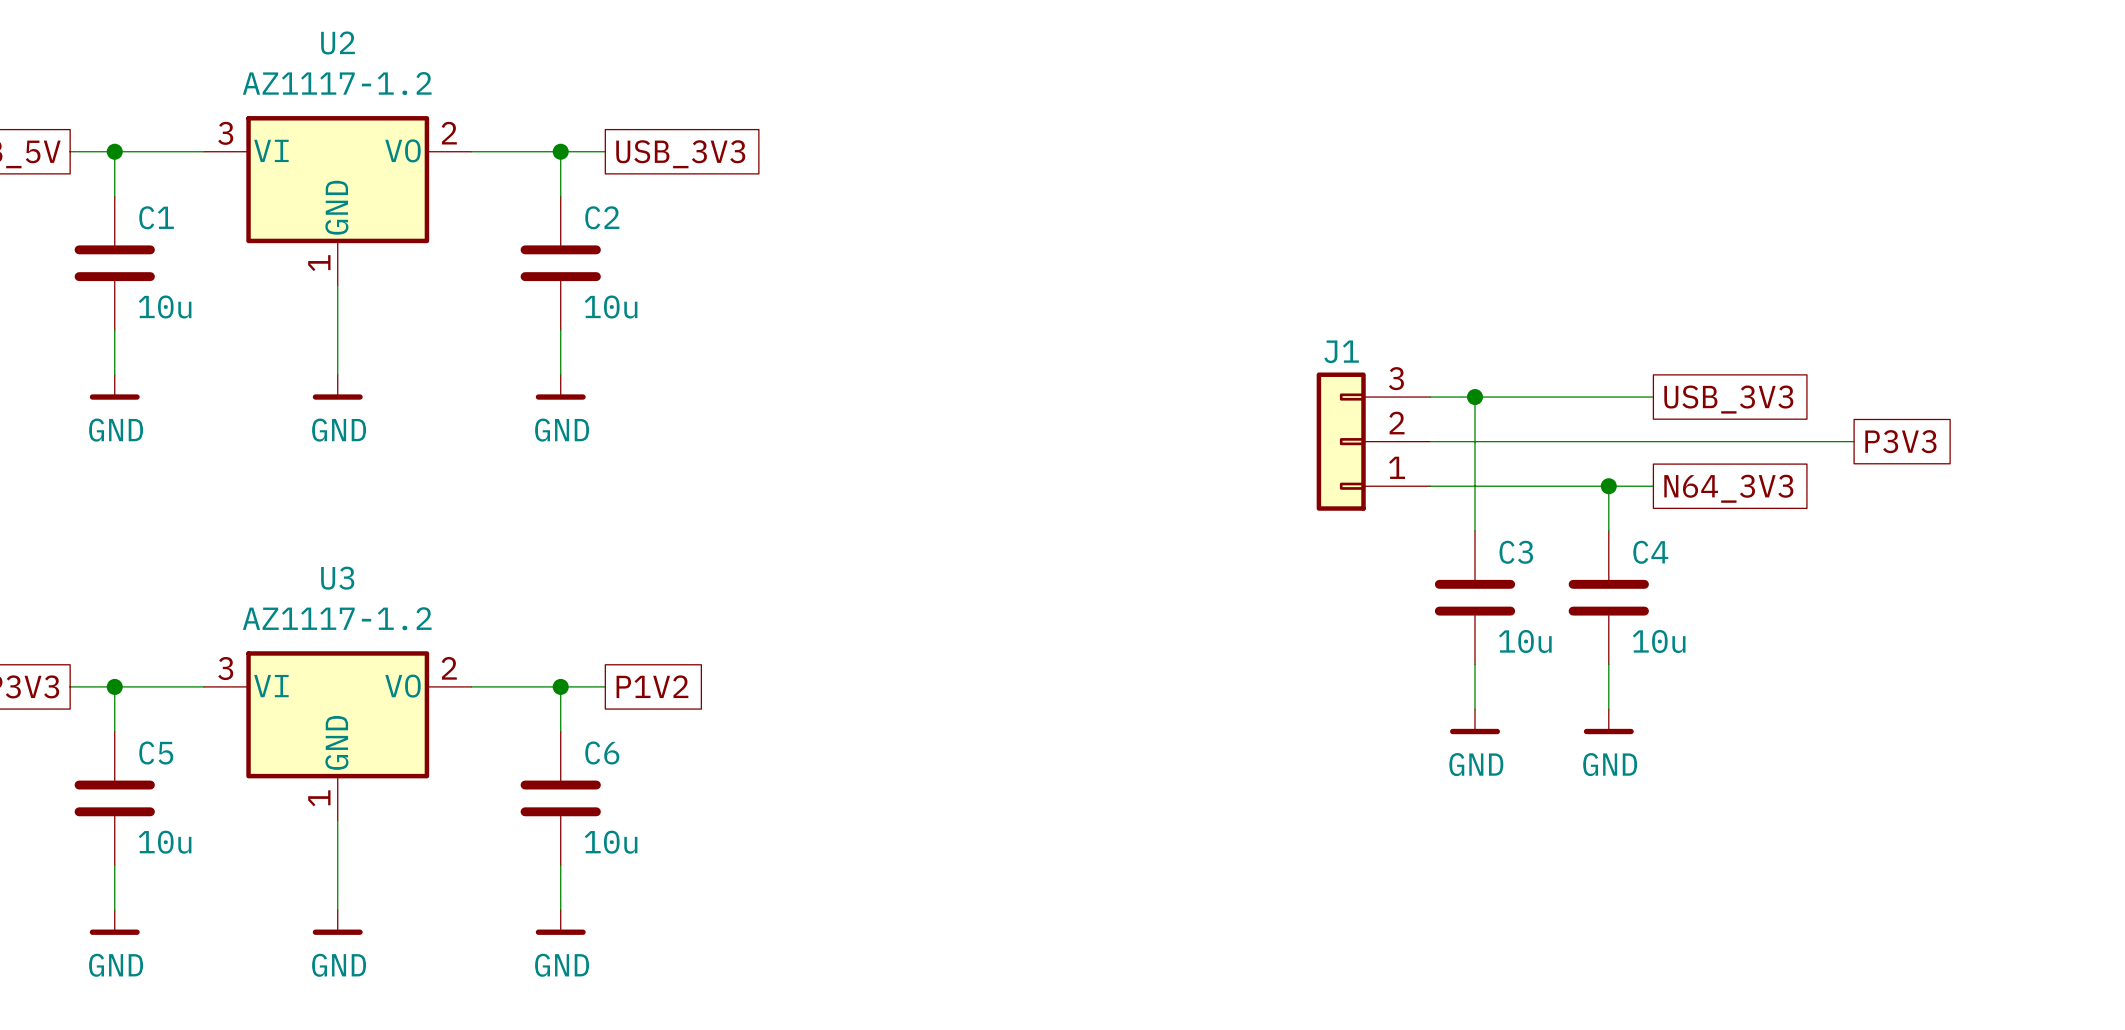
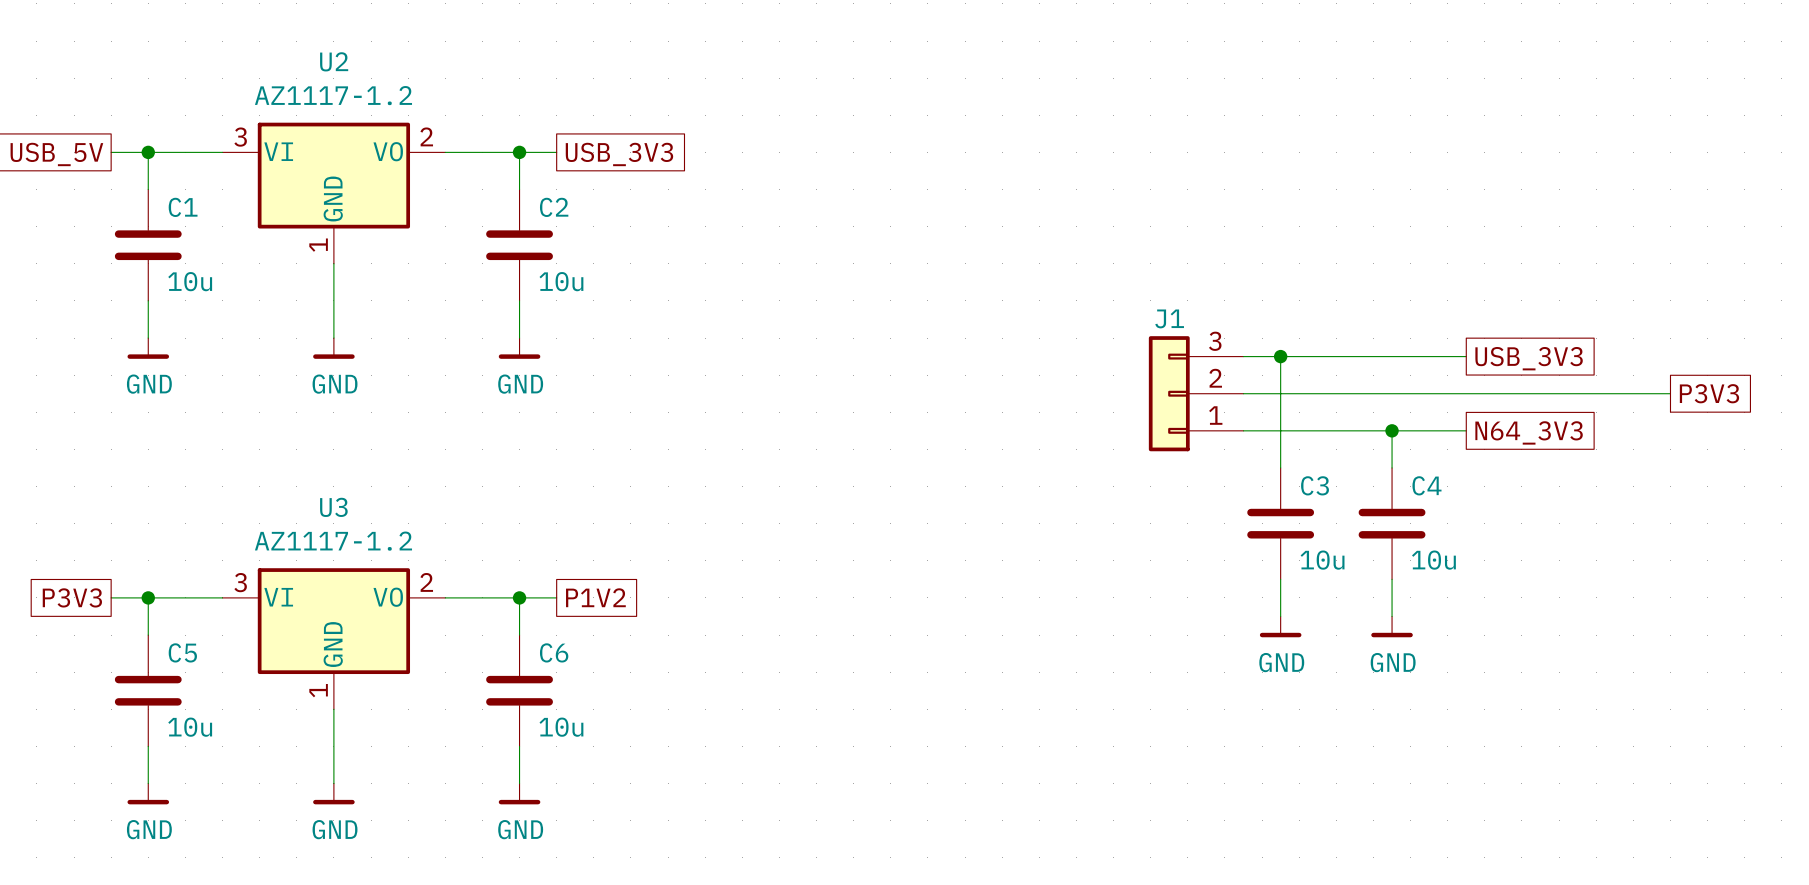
wire: none -> (1429, 356) (1466, 356)
global label position: USB_3V3 (1728, 399) -> USB_3V3 (1529, 358)
wire: none -> (1596, 393) (1670, 393)
global label position: P3V3 (1900, 441) -> P3V3 (1709, 393)
wire: none -> (1429, 430) (1466, 430)
global label position: N64_3V3 (1728, 488) -> N64_3V3 (1529, 432)

